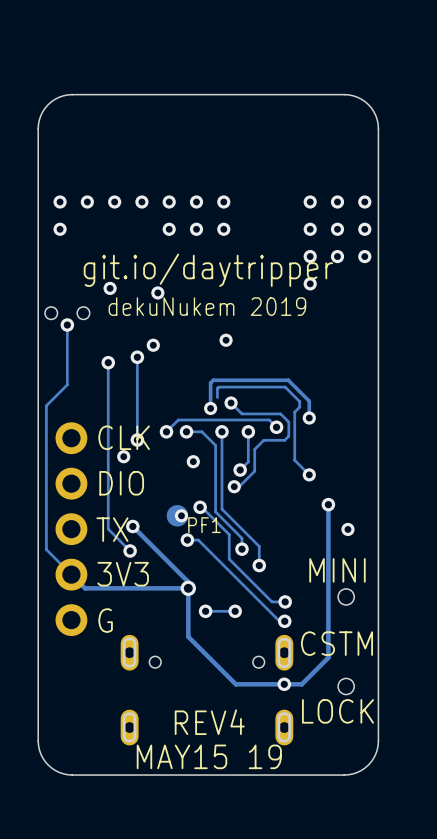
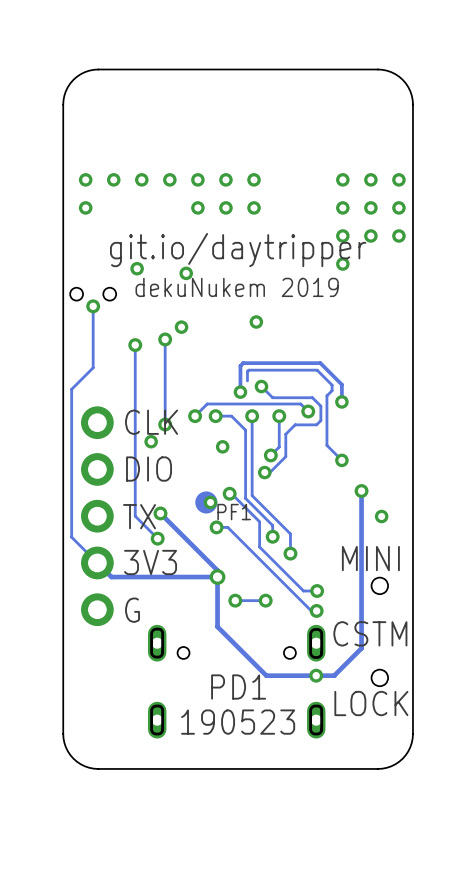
text: none -> PD1 (238, 687)
text: REV4 (209, 722) -> 190523 (238, 722)
text: MAY15 19 (209, 756) -> none

